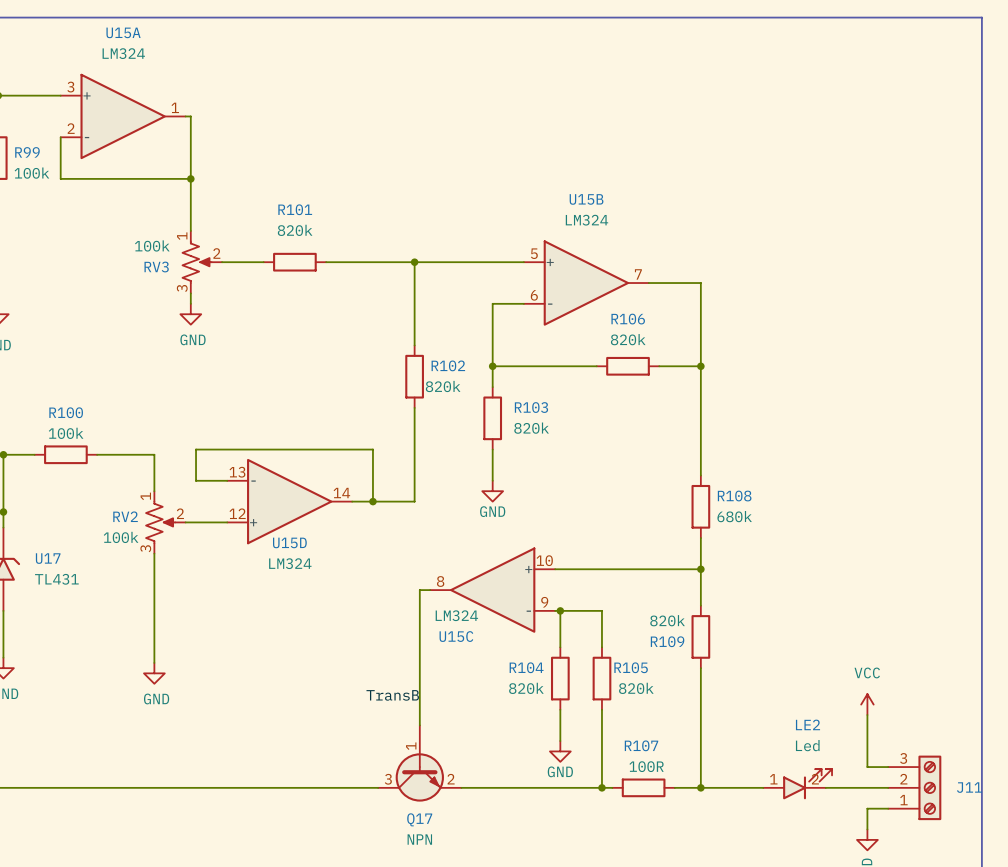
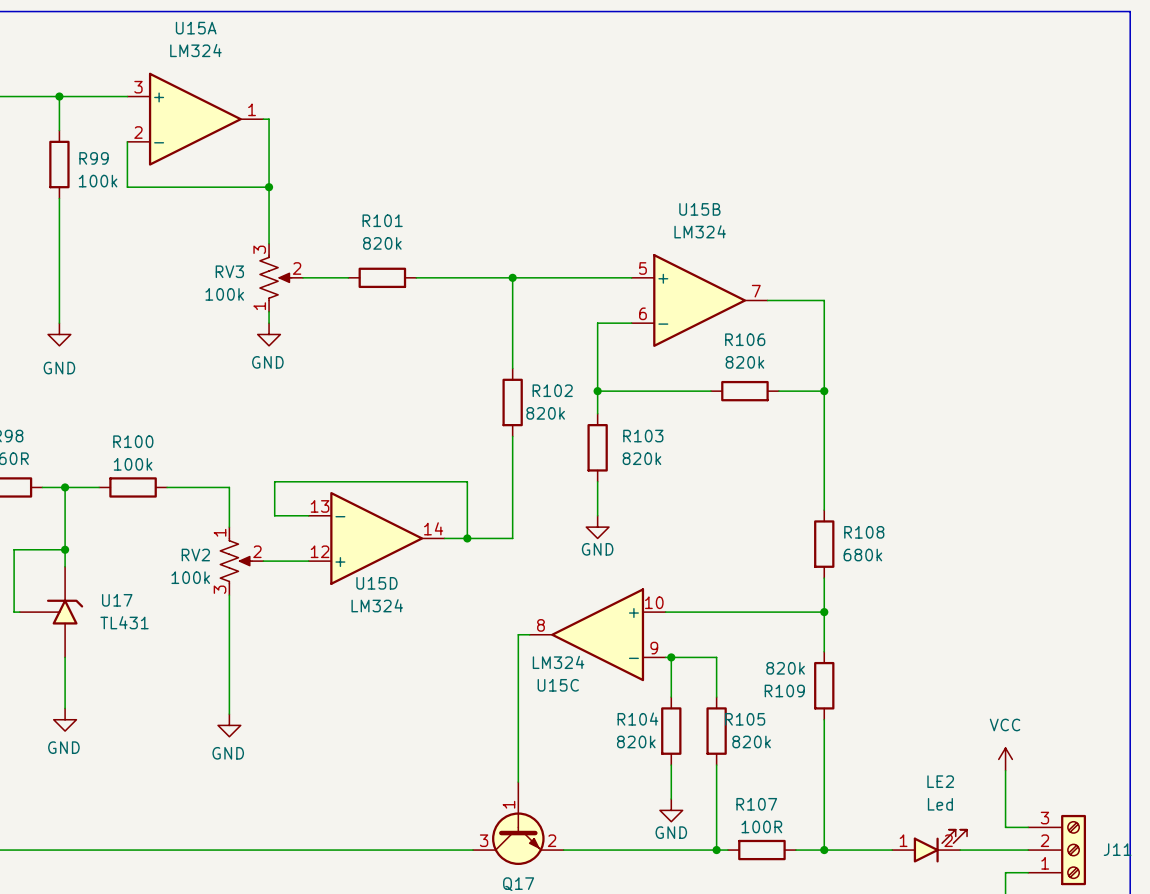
RV3 flip: as is (197, 262) -> up-down (275, 277)
label: TransB (392, 695) -> none

